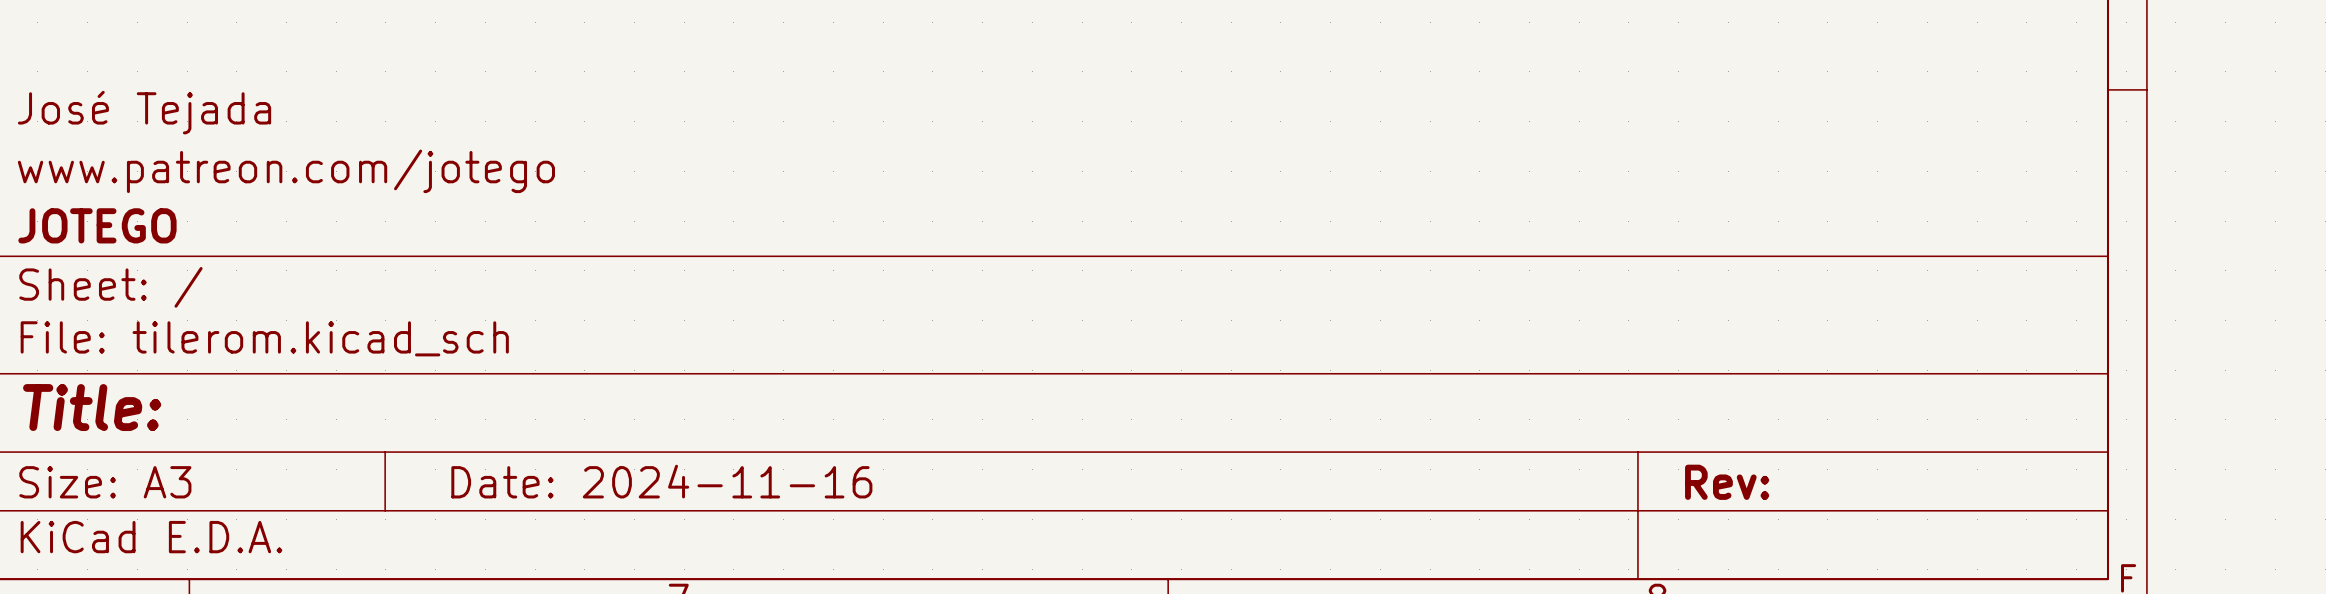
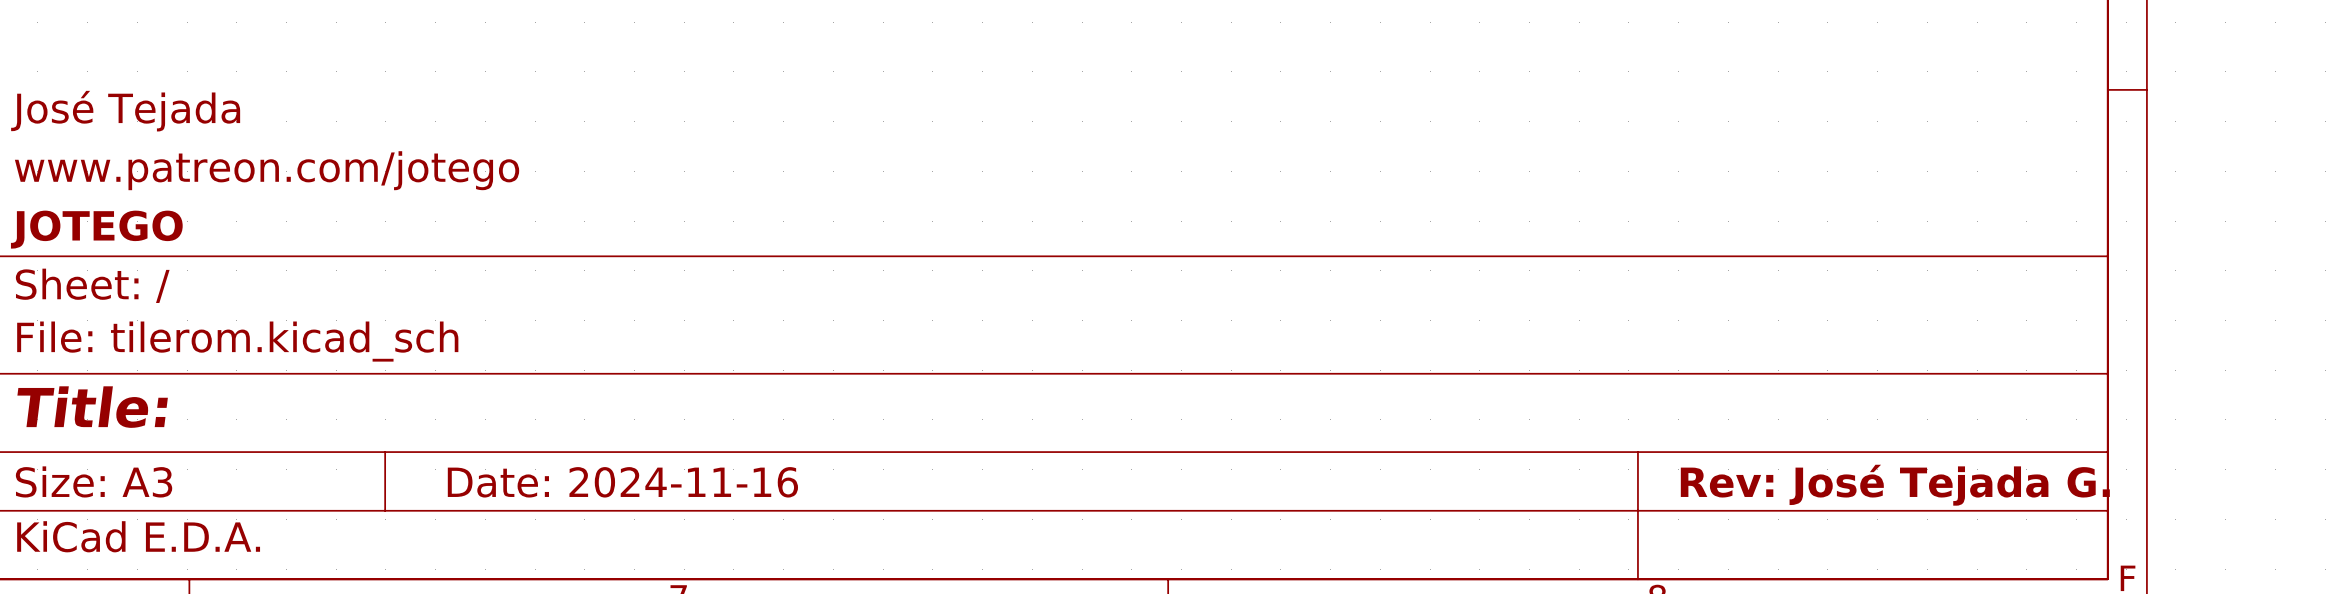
title block: Rev: (1727, 482) -> Rev: José Tejada G. (1895, 485)

